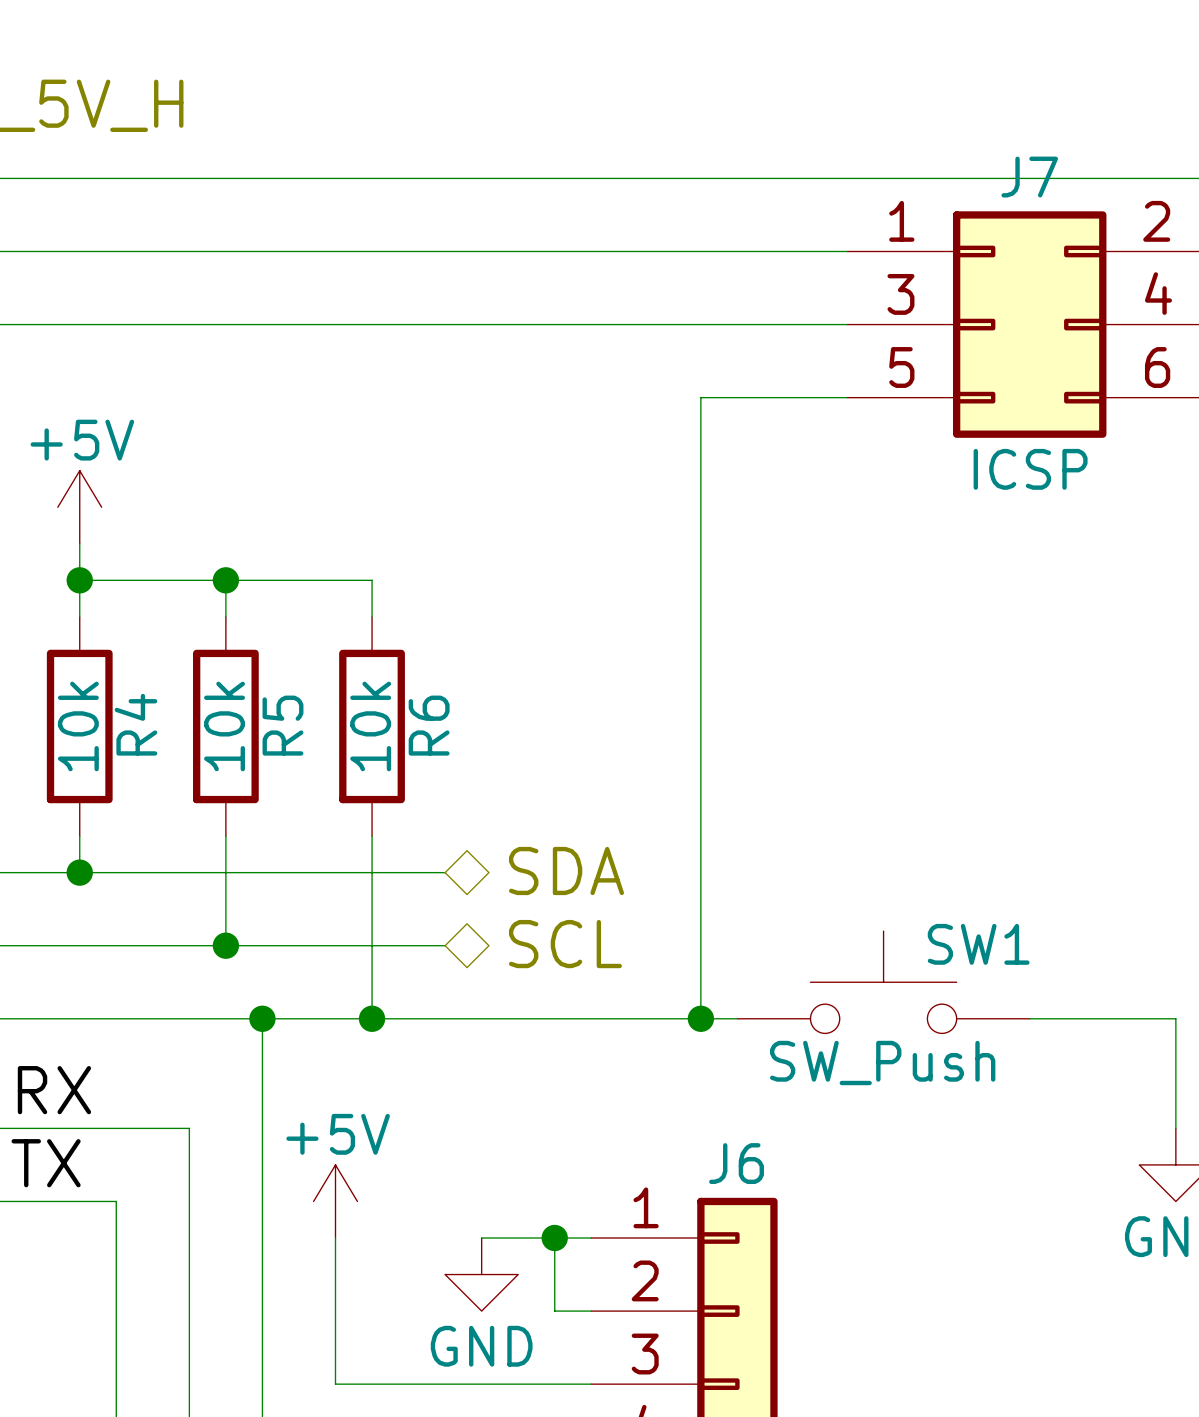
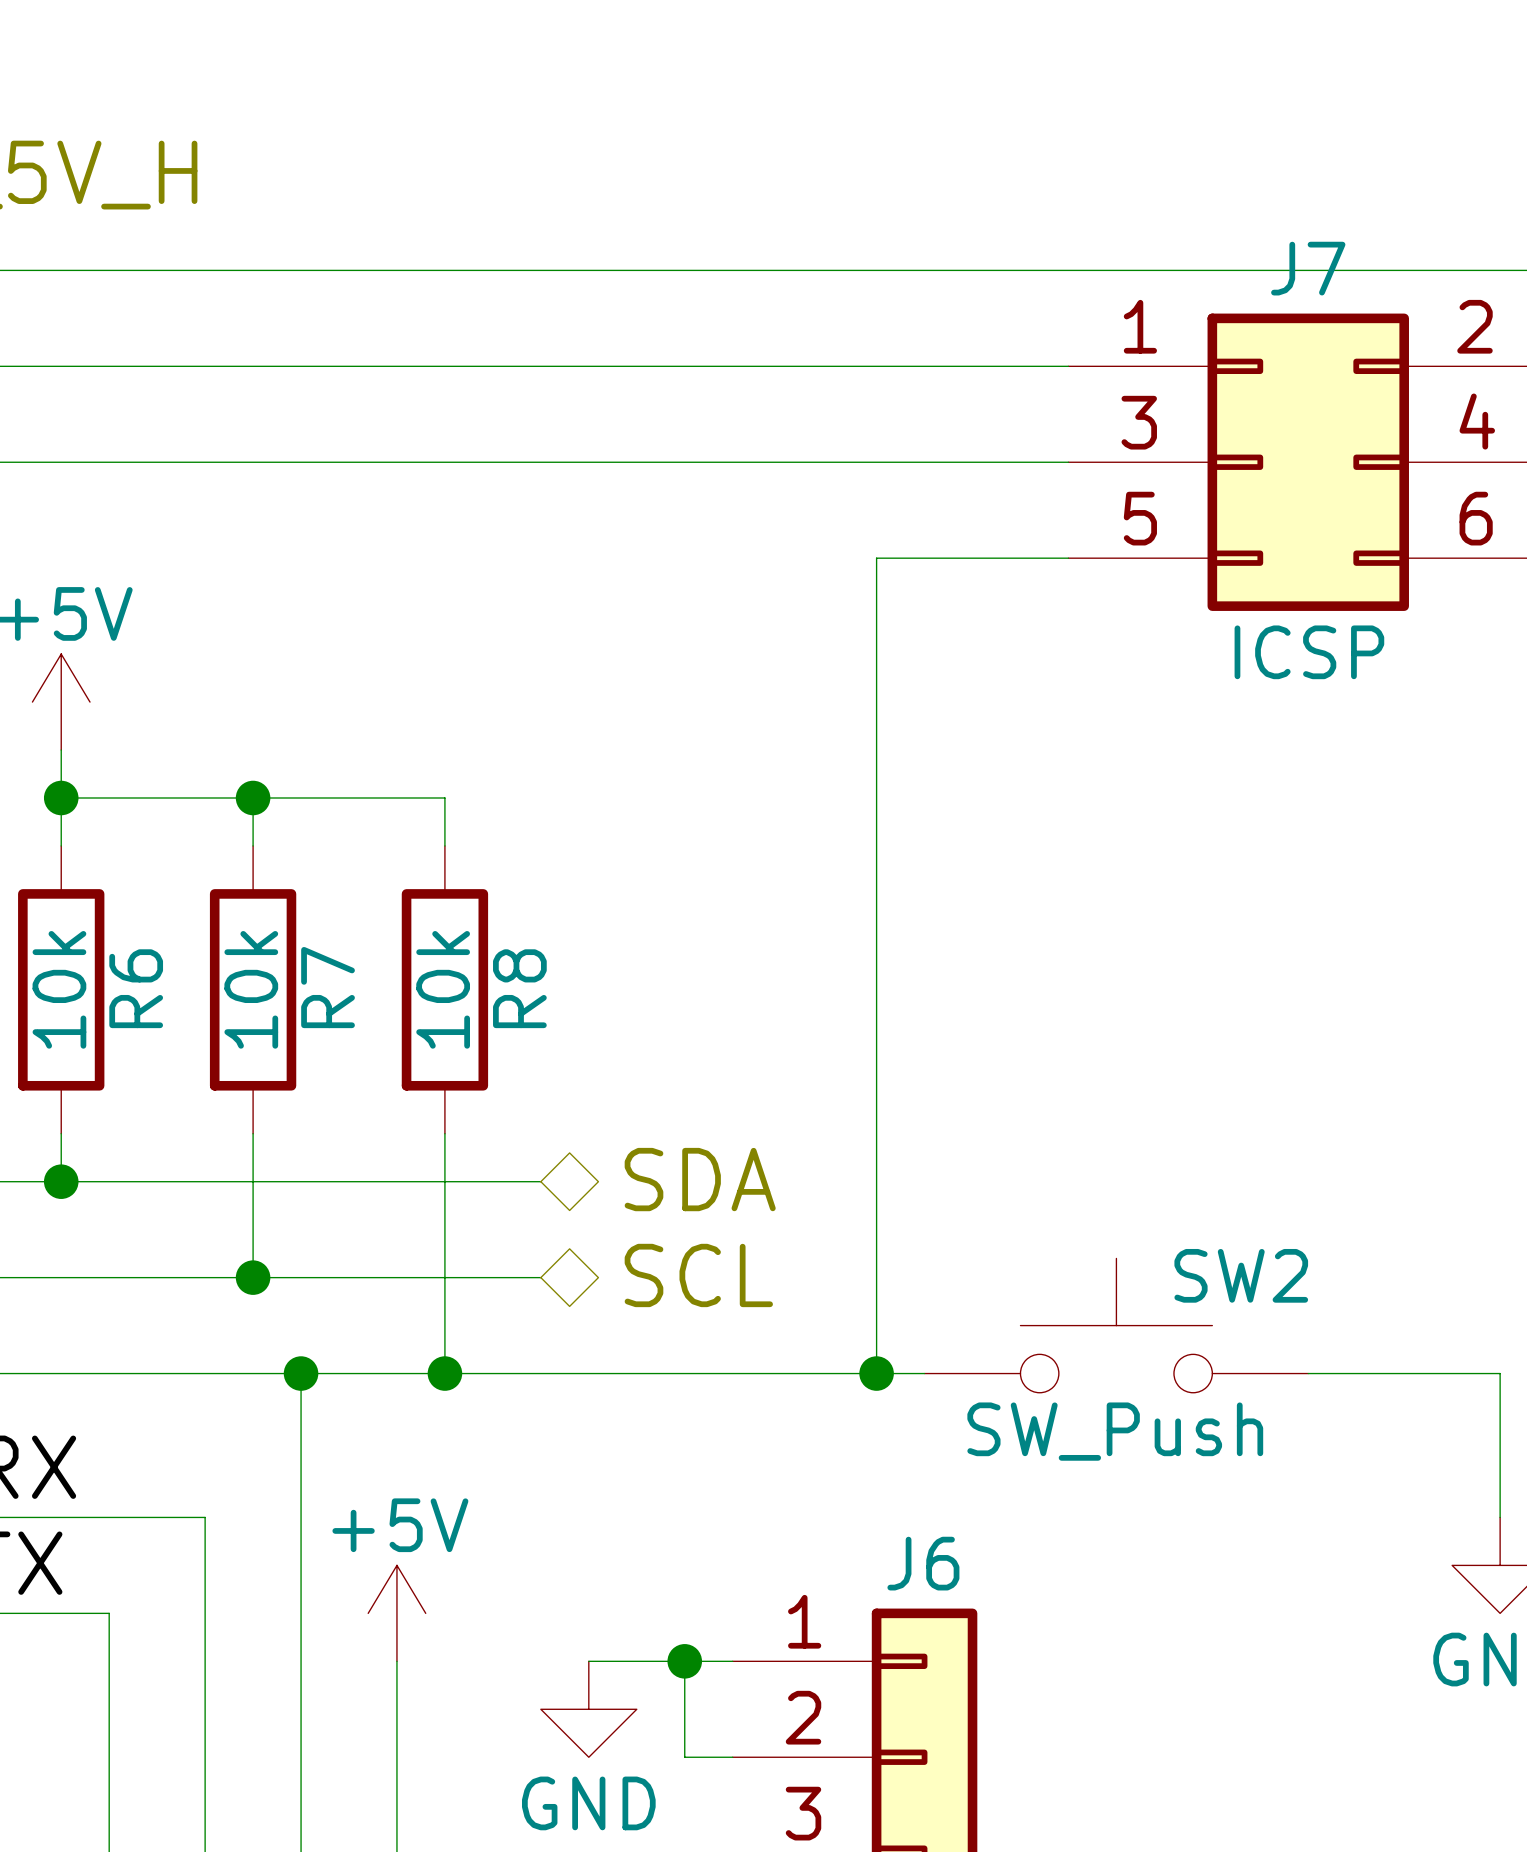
R4 name: R4 (135, 724) -> R6 (136, 988)
R5 name: R5 (282, 725) -> R7 (328, 987)
R6 name: R6 (429, 725) -> R8 (519, 988)
SW1 name: SW1 (978, 944) -> SW2 (1241, 1275)

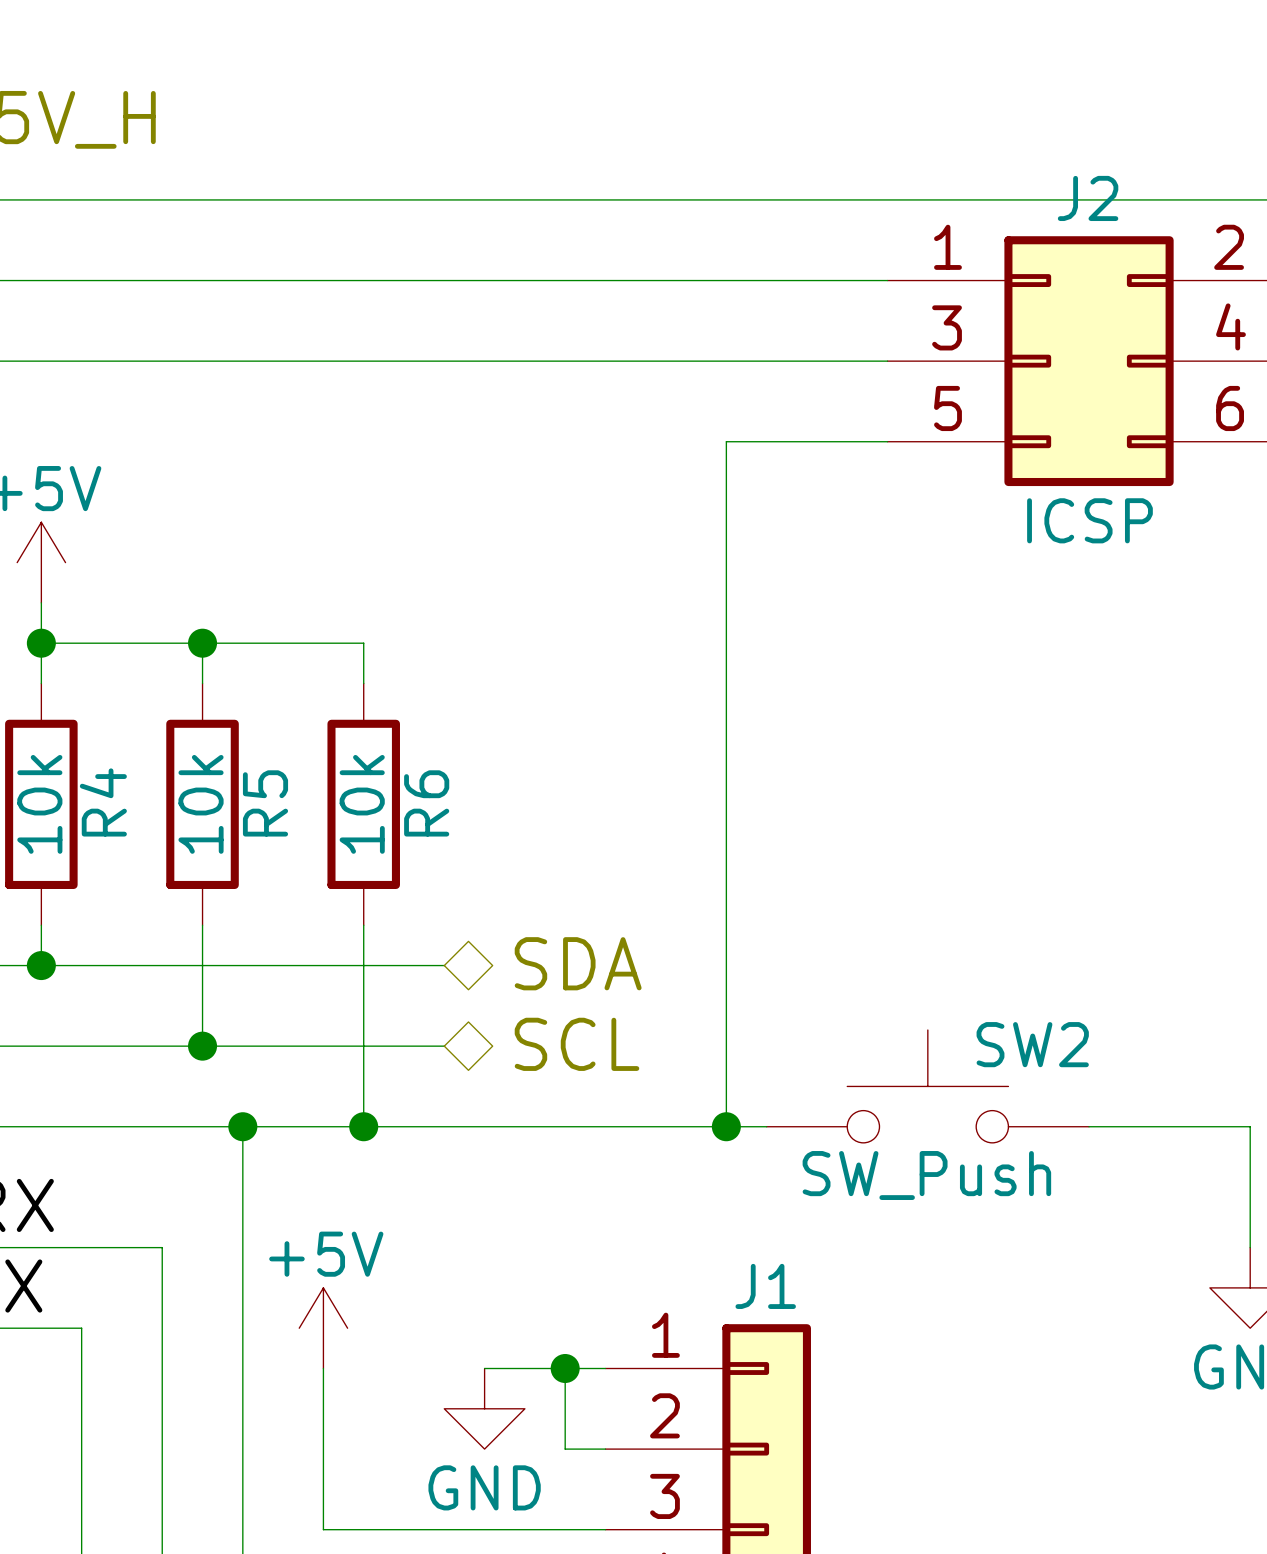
J7 name: J7 (1308, 268) -> J2 (1088, 198)
R7 name: R7 (328, 987) -> R5 (265, 803)
R6 name: R6 (136, 988) -> R4 (103, 802)
R8 name: R8 (519, 988) -> R6 (426, 803)
J6 name: J6 (923, 1563) -> J1 (765, 1286)

